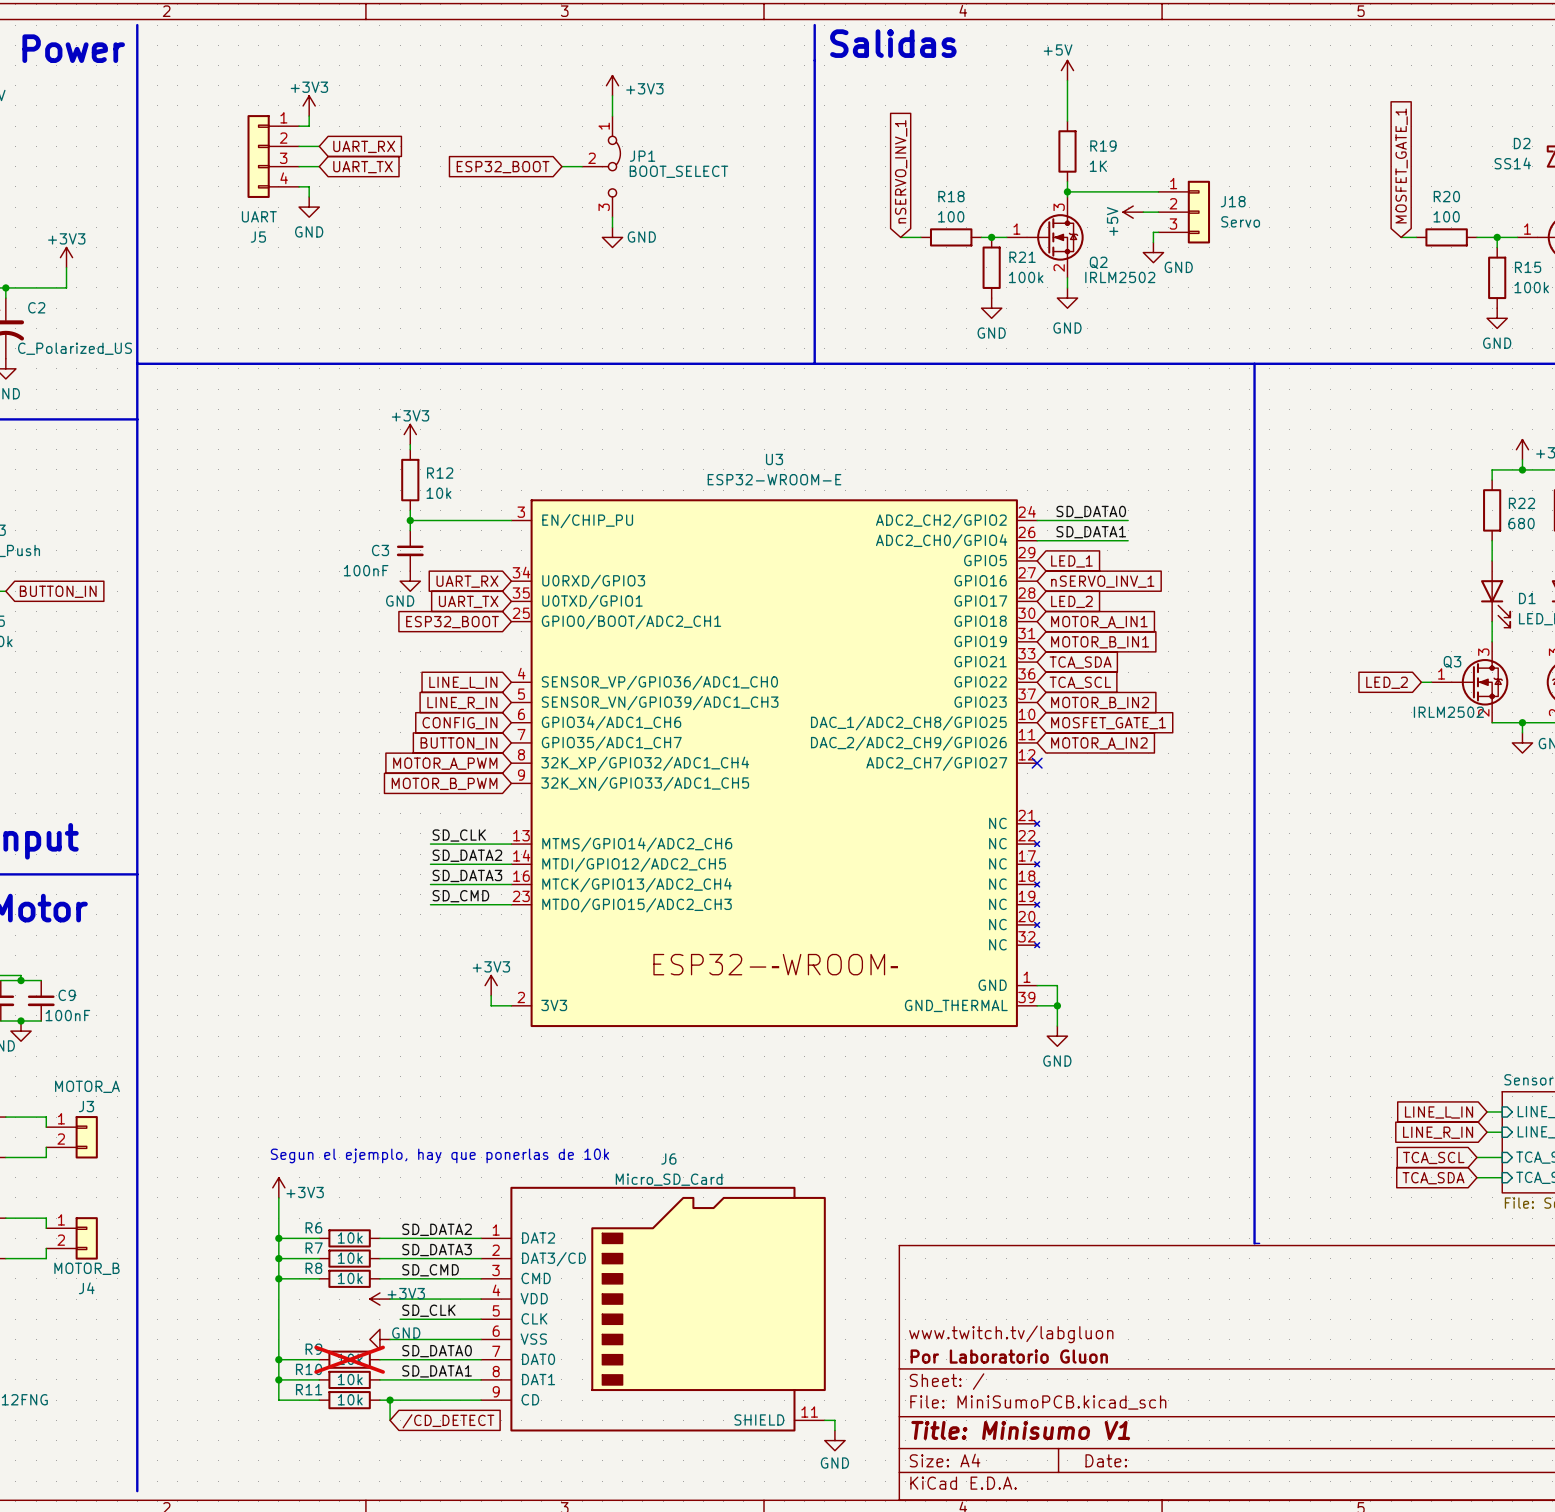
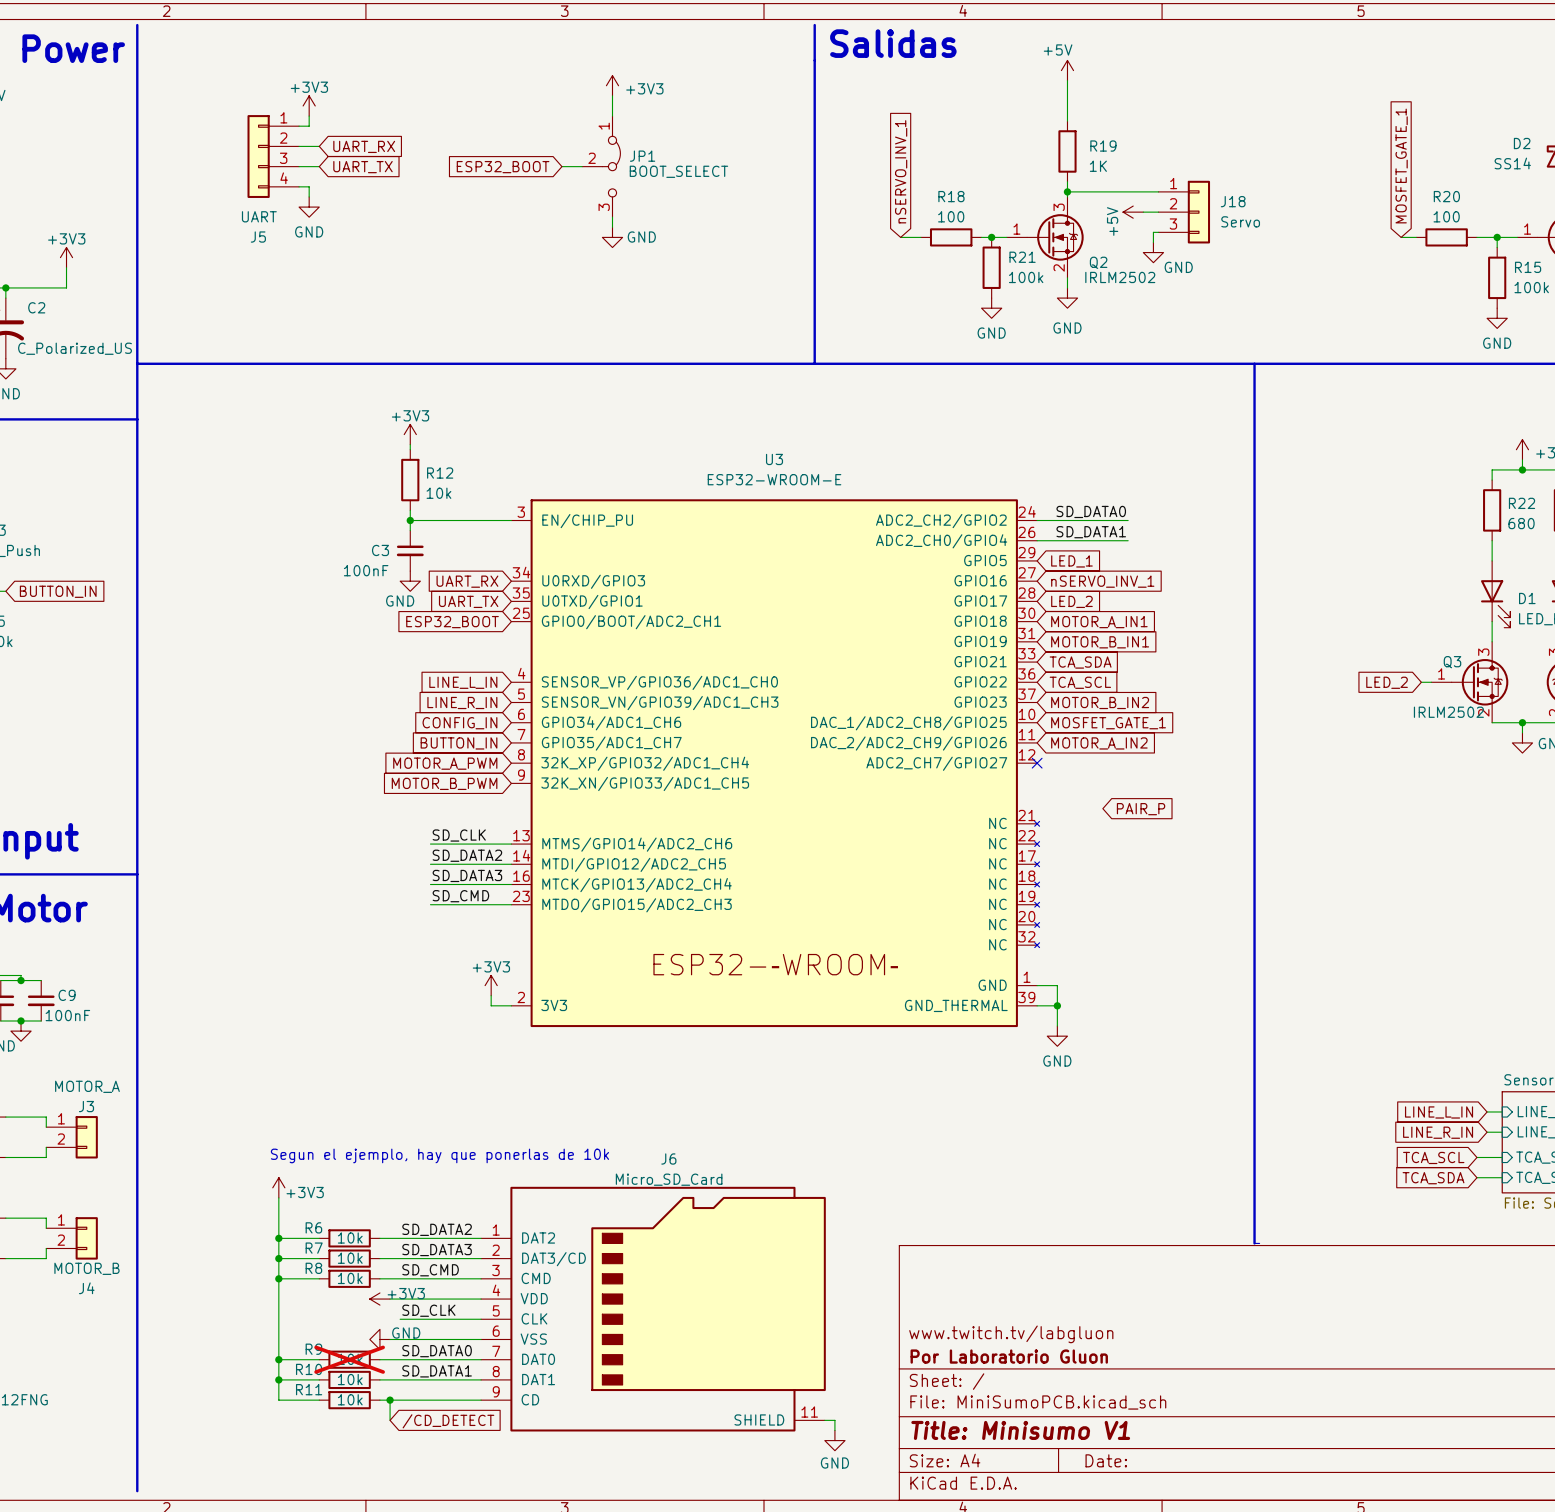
global label: none -> PAIR_P (1141, 809)

